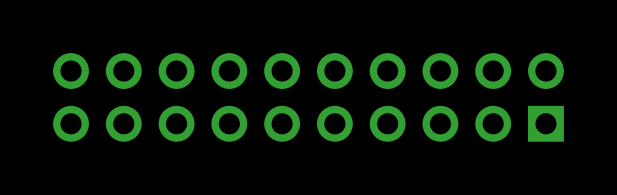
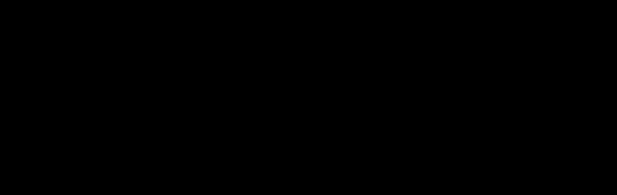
part: (308, 97) -> none

